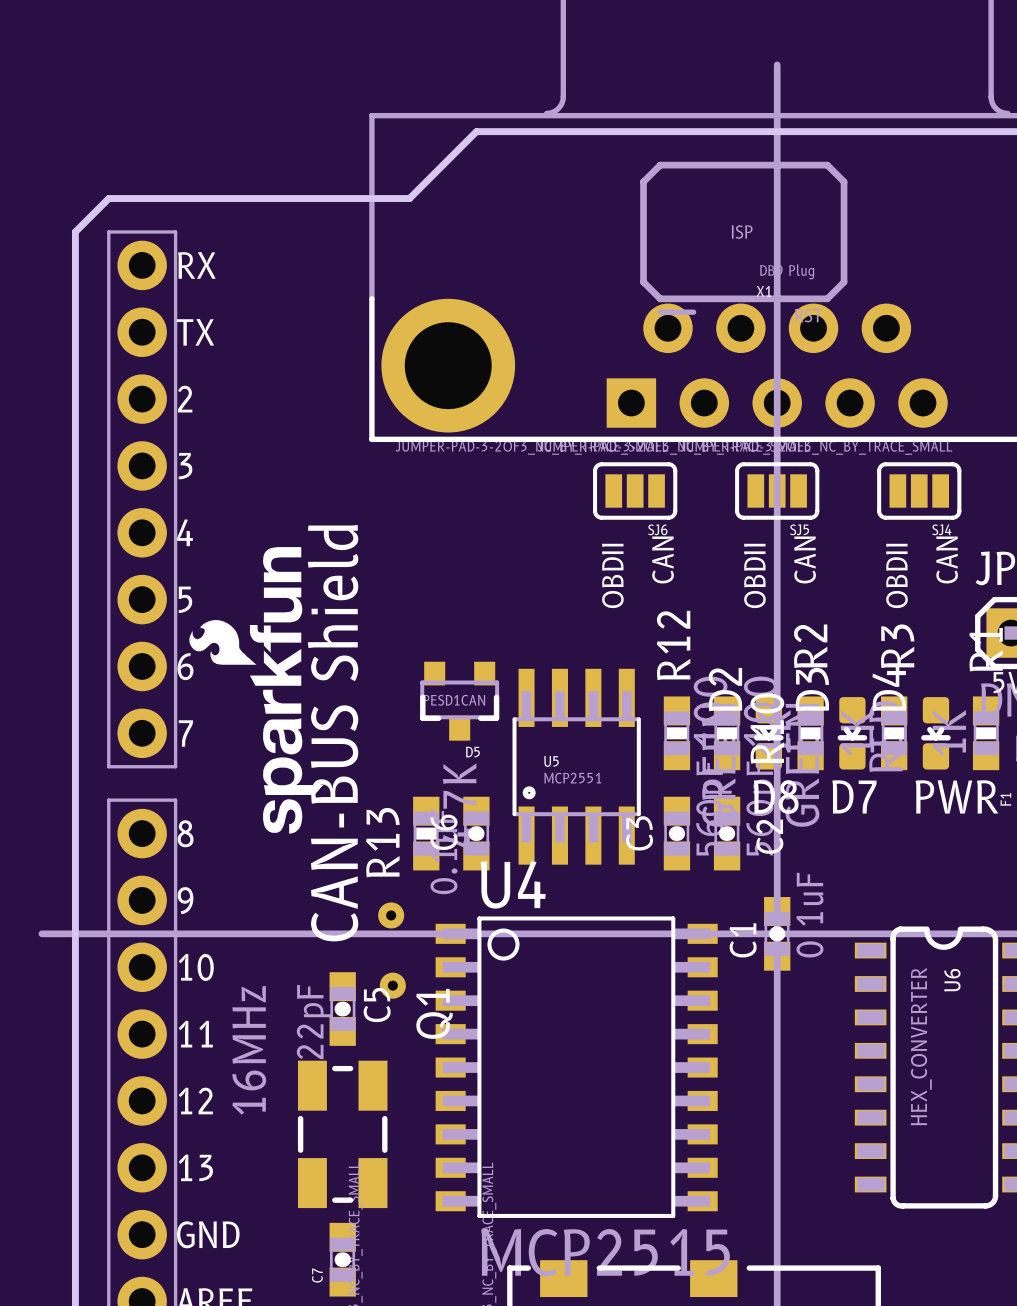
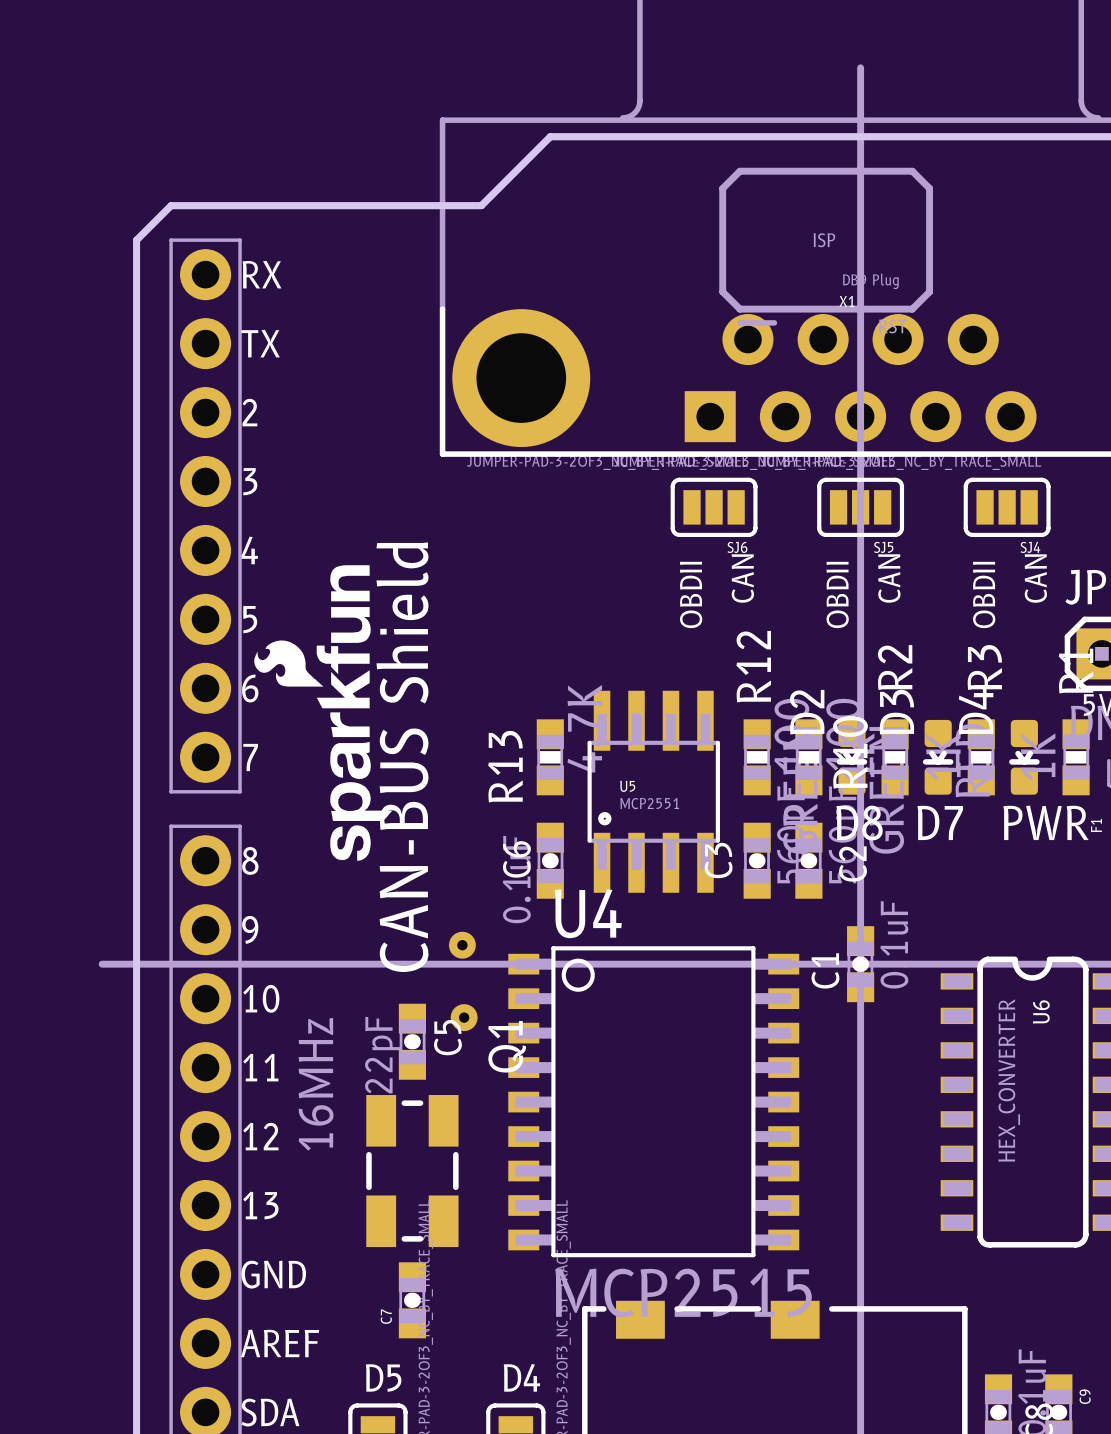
D5: PESD1CAN (459, 701) -> none
R13 position: (426, 833) -> (550, 757)

